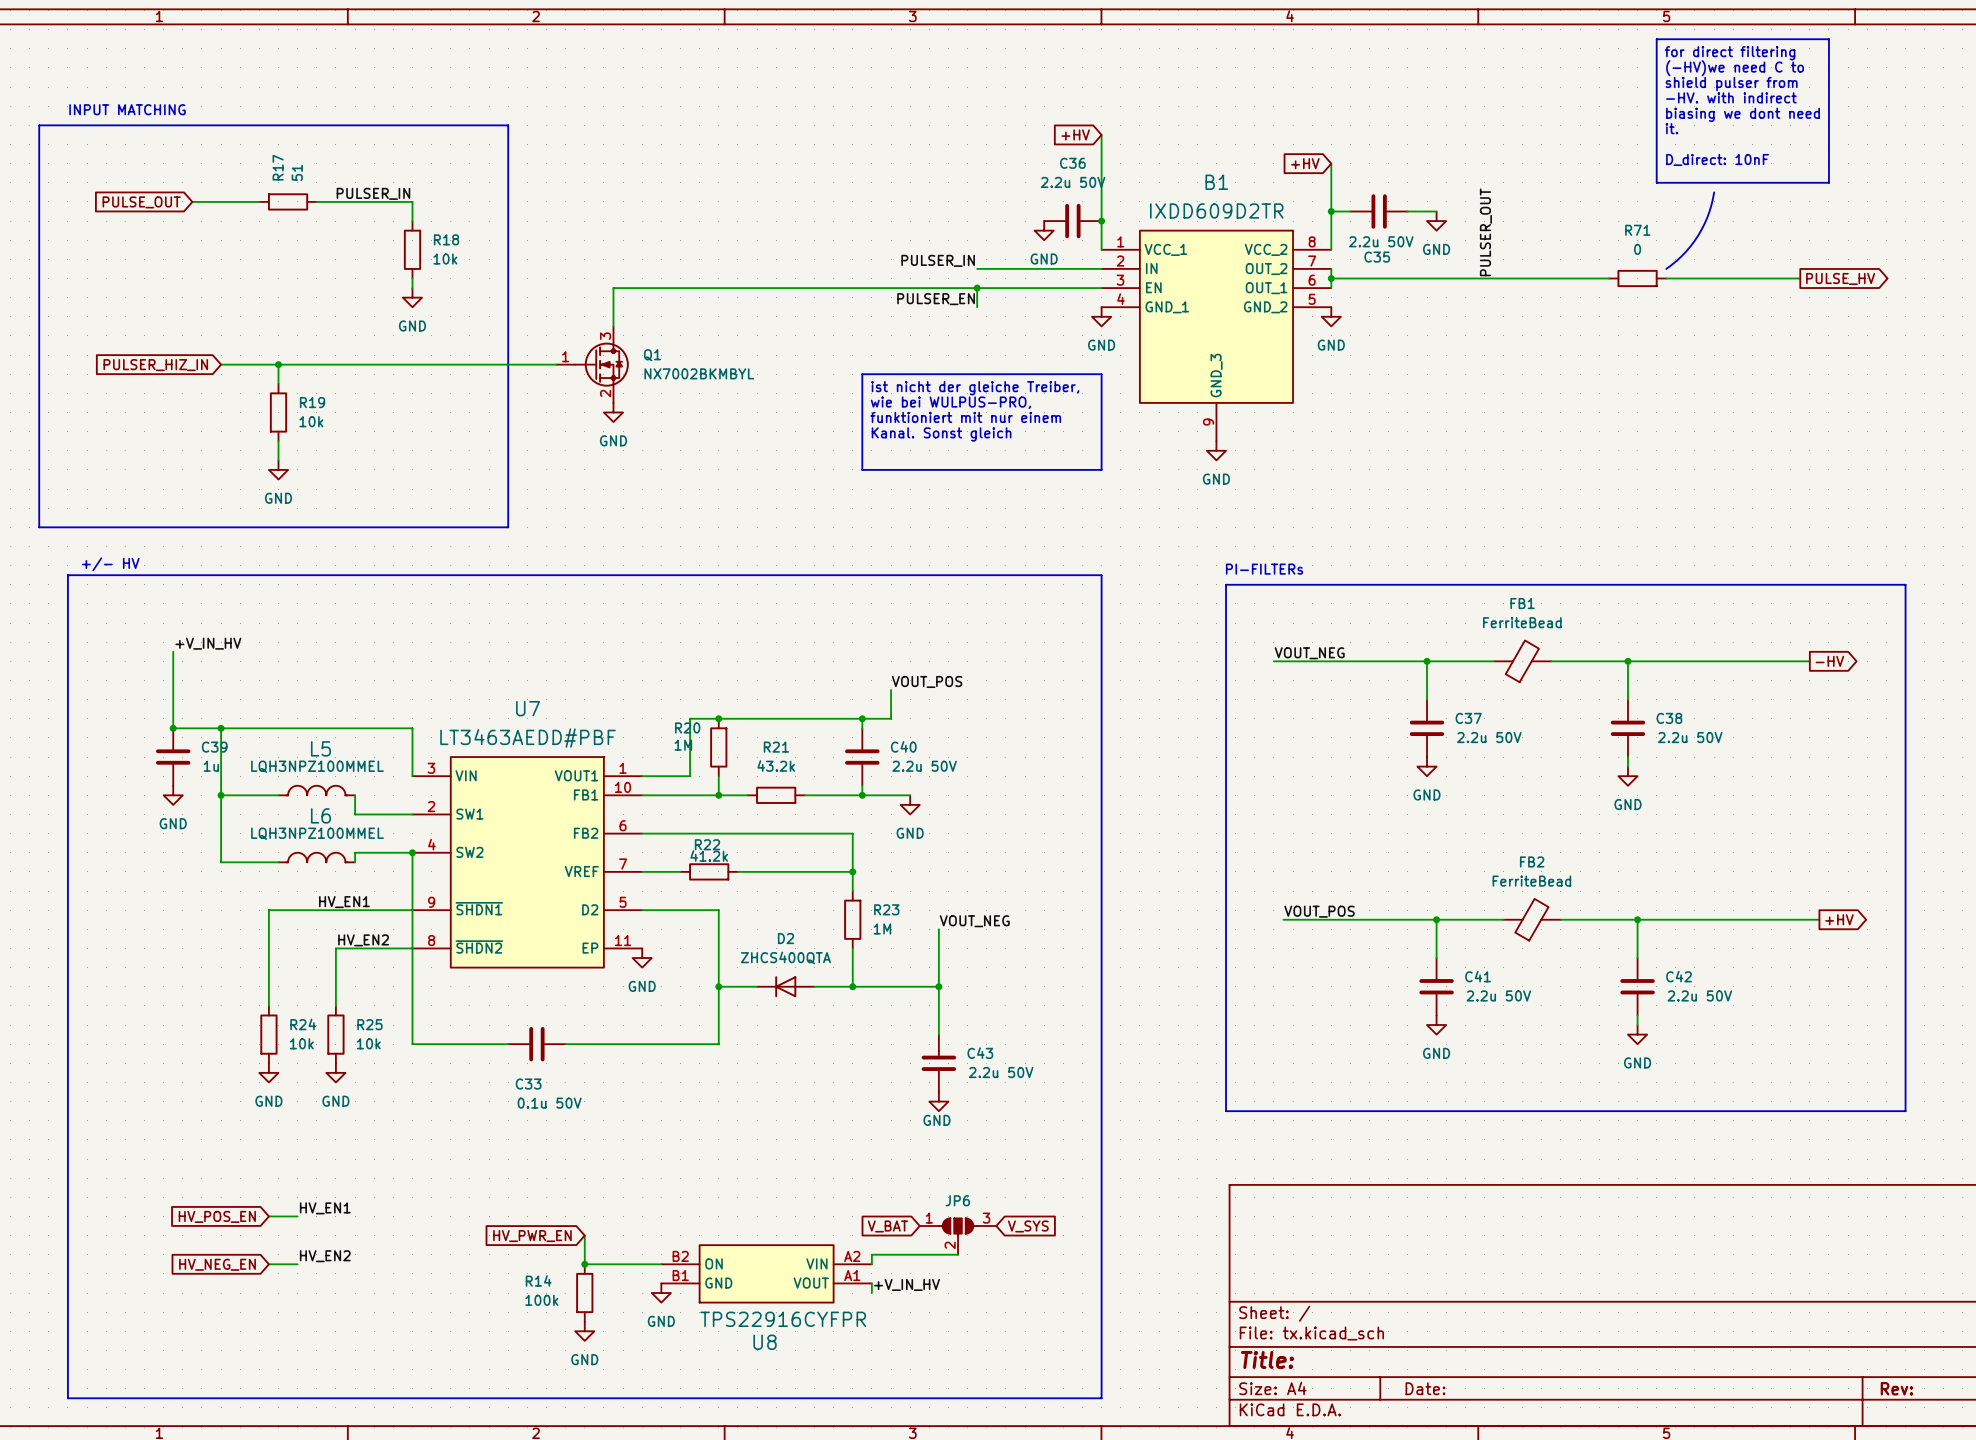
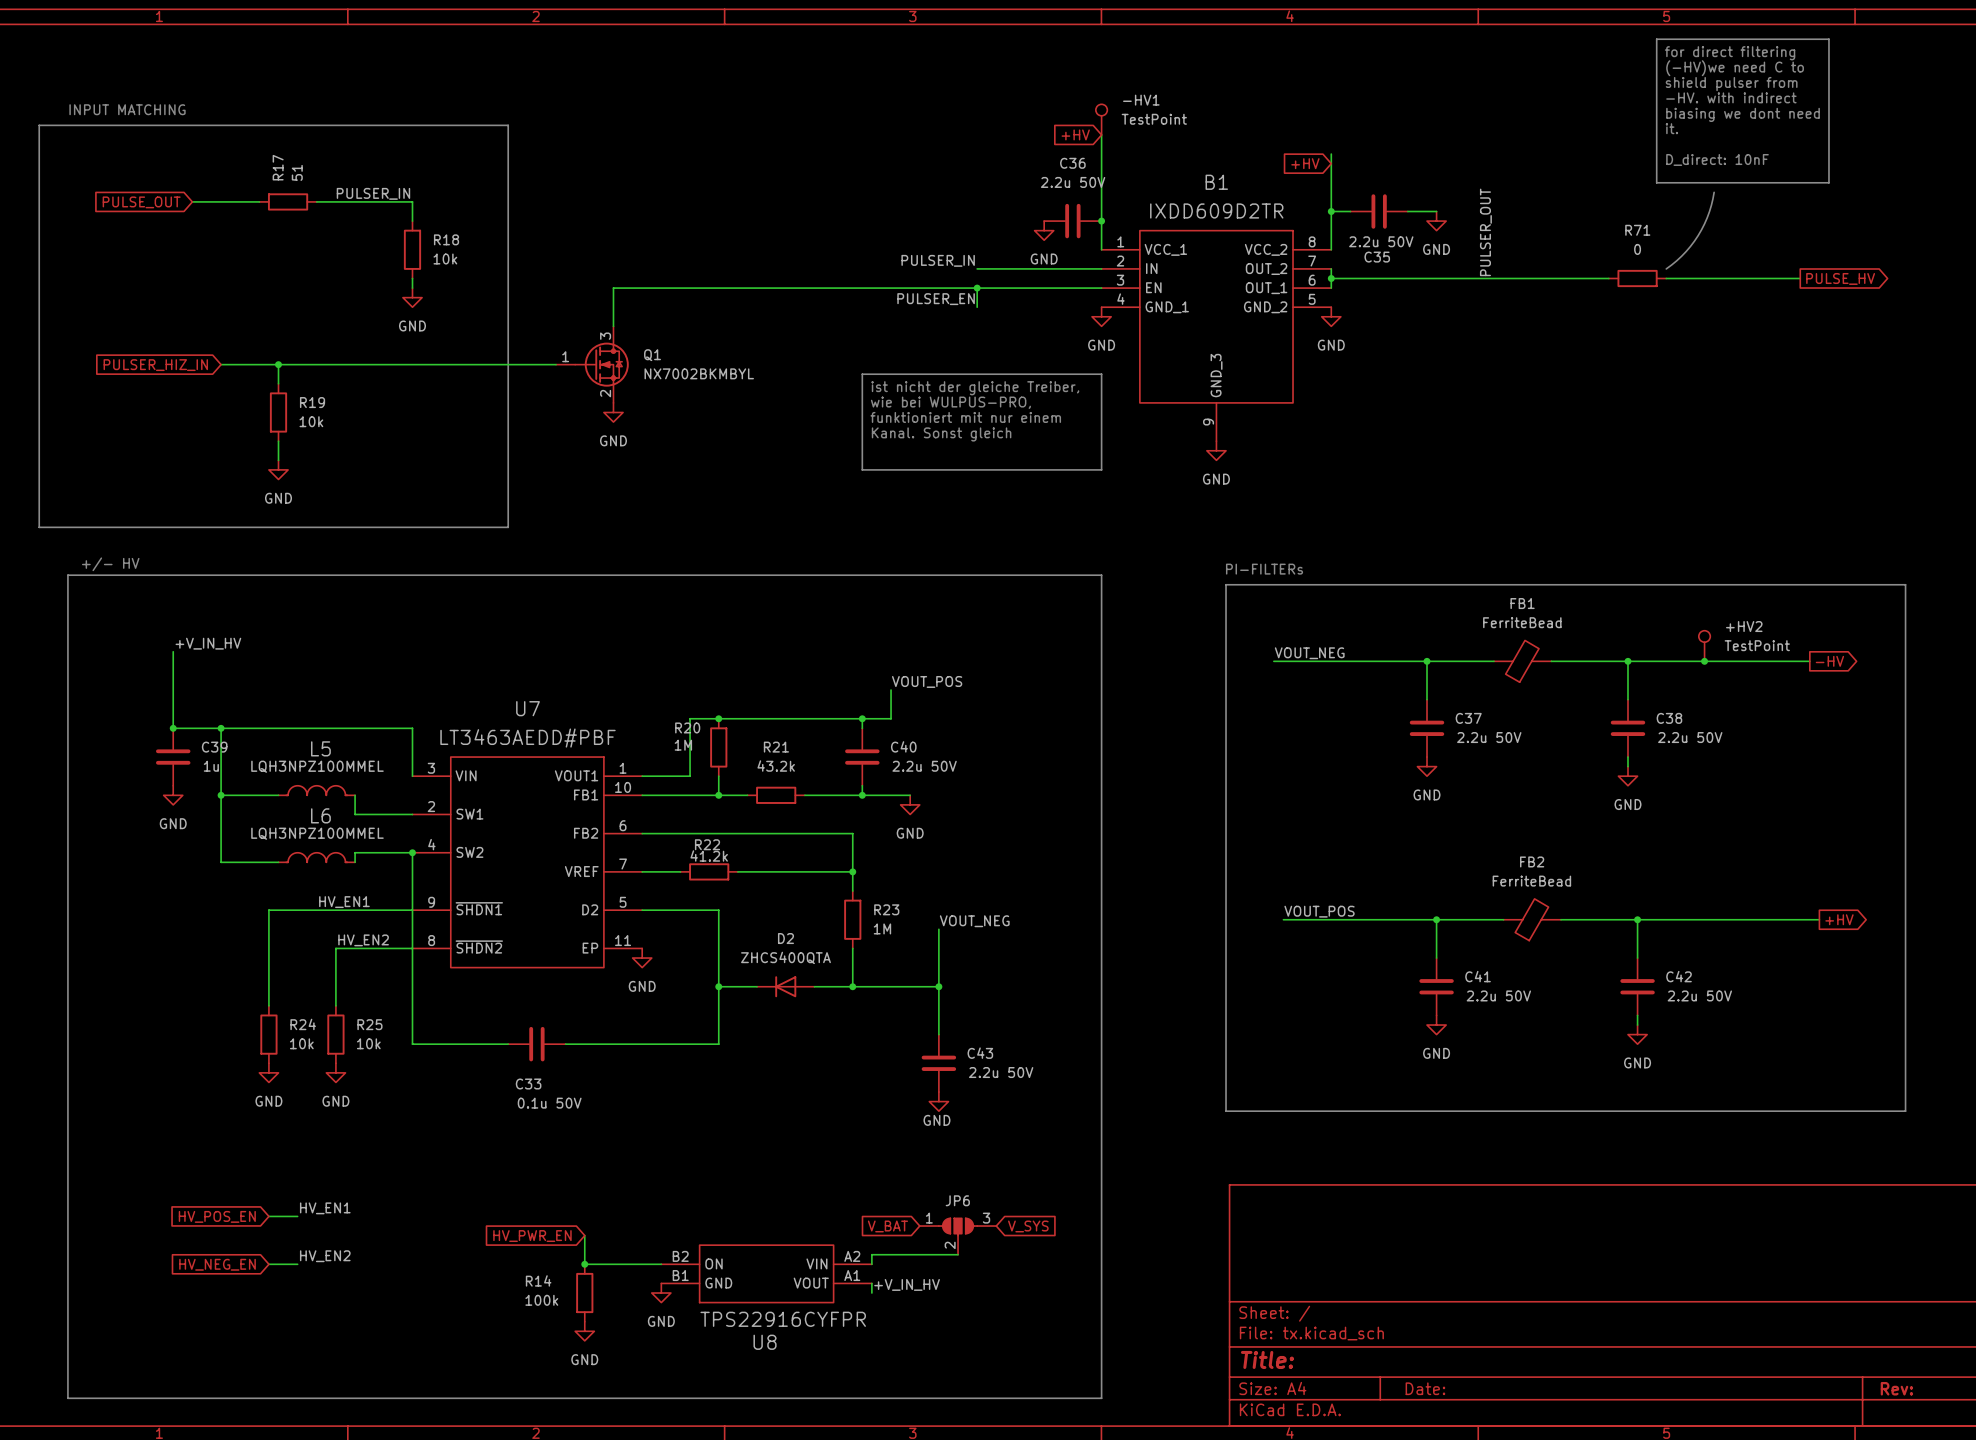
-HV1: none -> TestPoint (1101, 119)
wire: none -> (1331, 154) (1331, 163)
+HV2: none -> TestPoint (1704, 646)
junction: none -> (1704, 661)

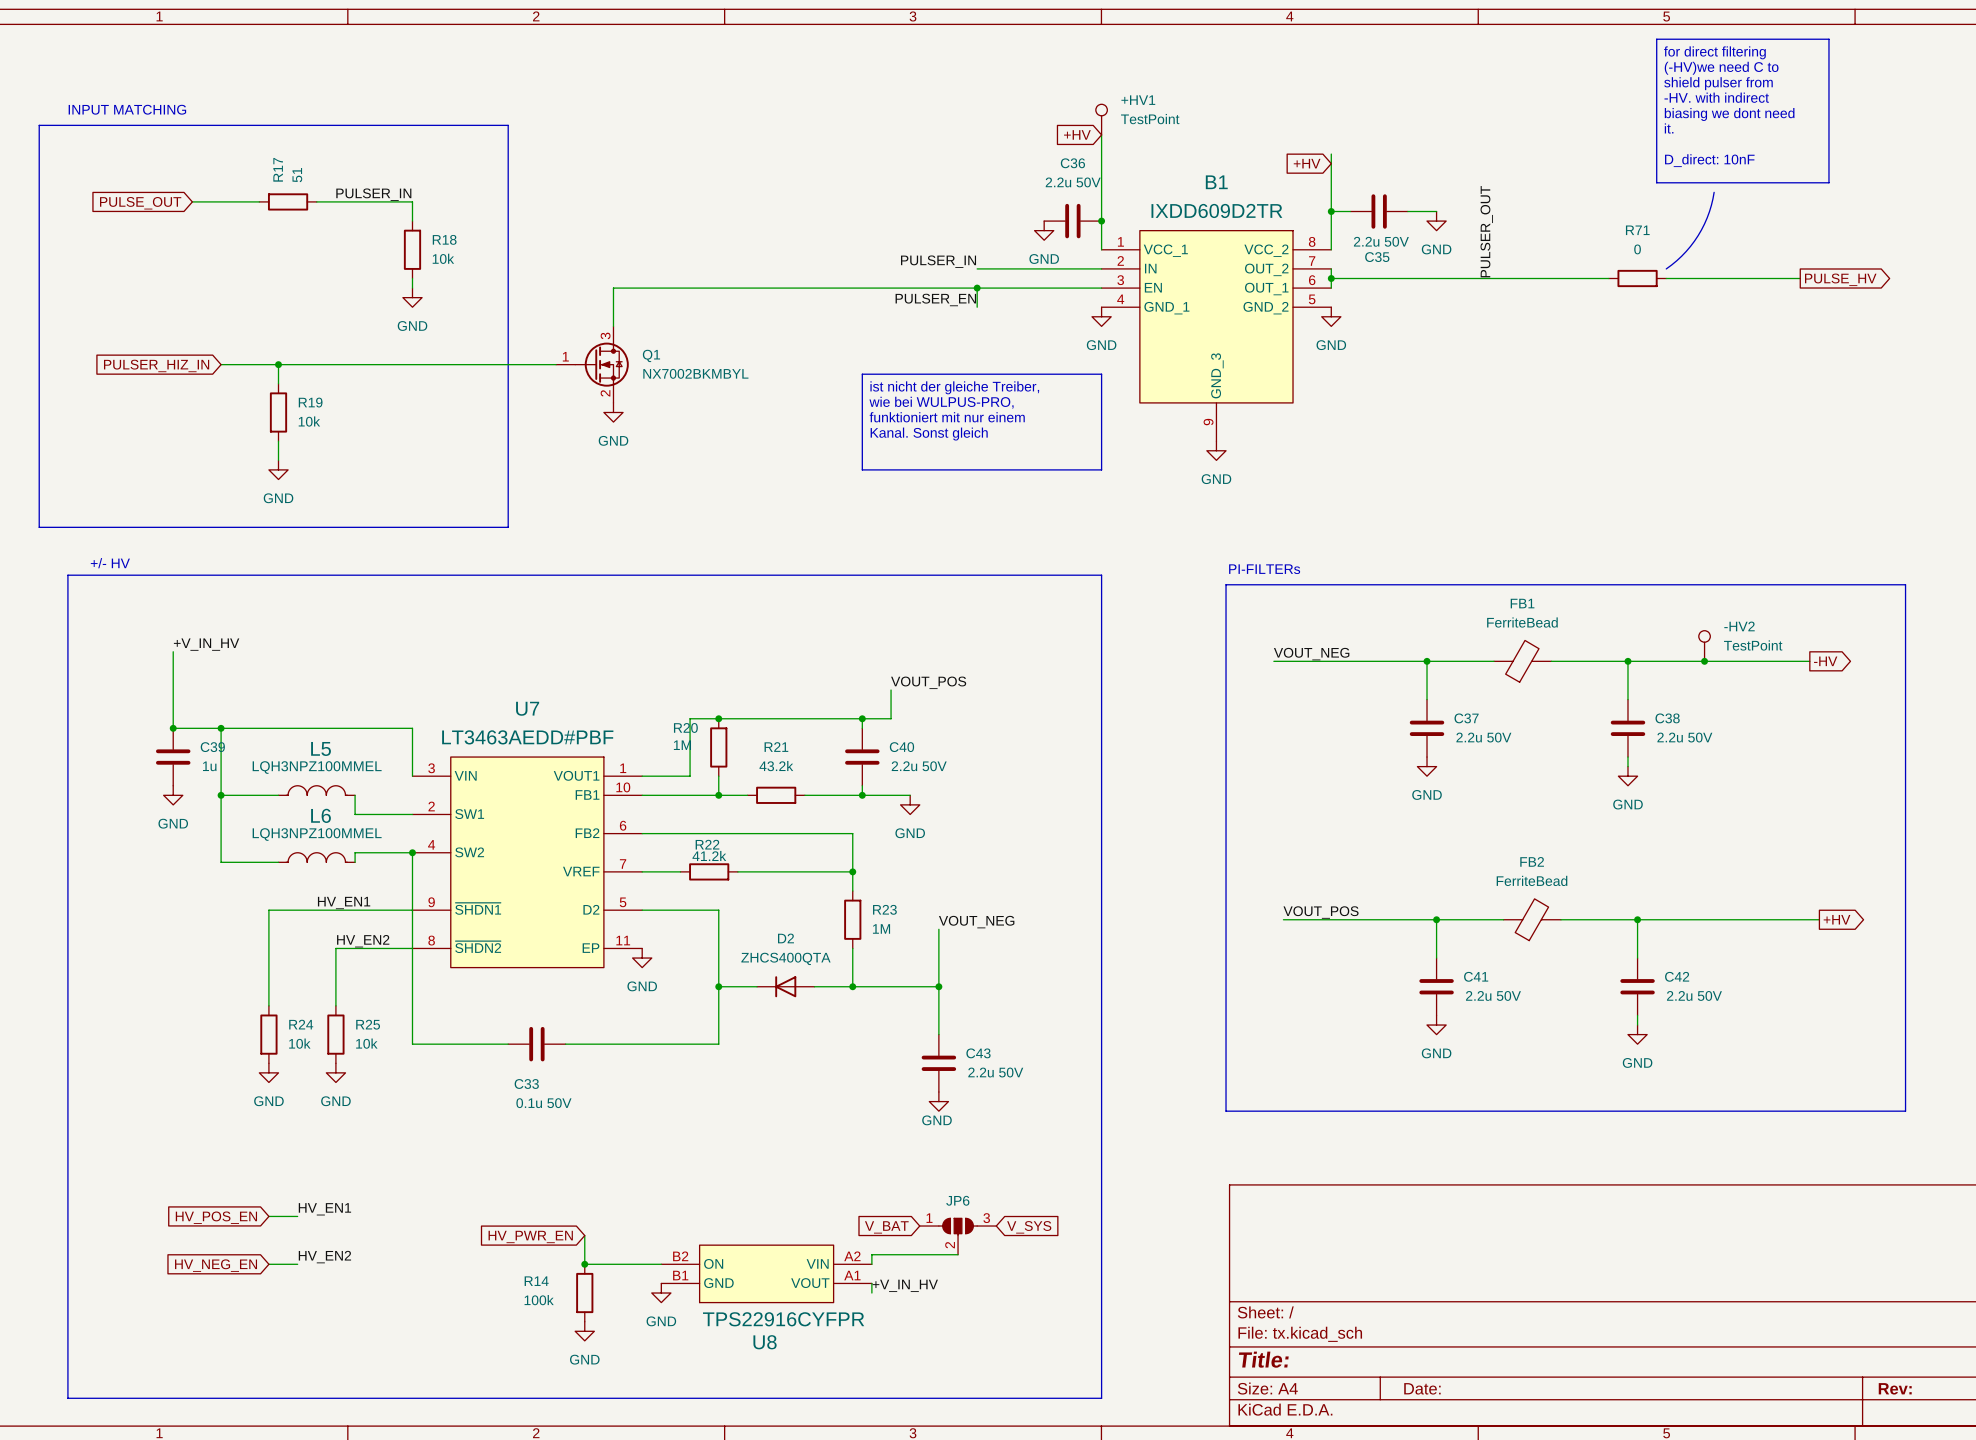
-HV1 name: -HV1 (1141, 100) -> +HV1 (1138, 100)
+HV2 name: +HV2 (1744, 626) -> -HV2 (1739, 626)

